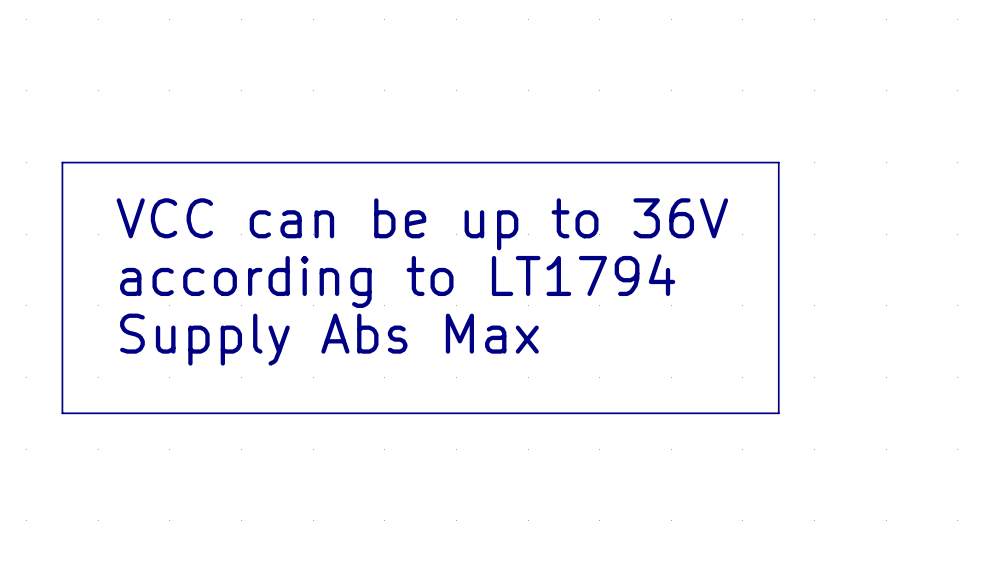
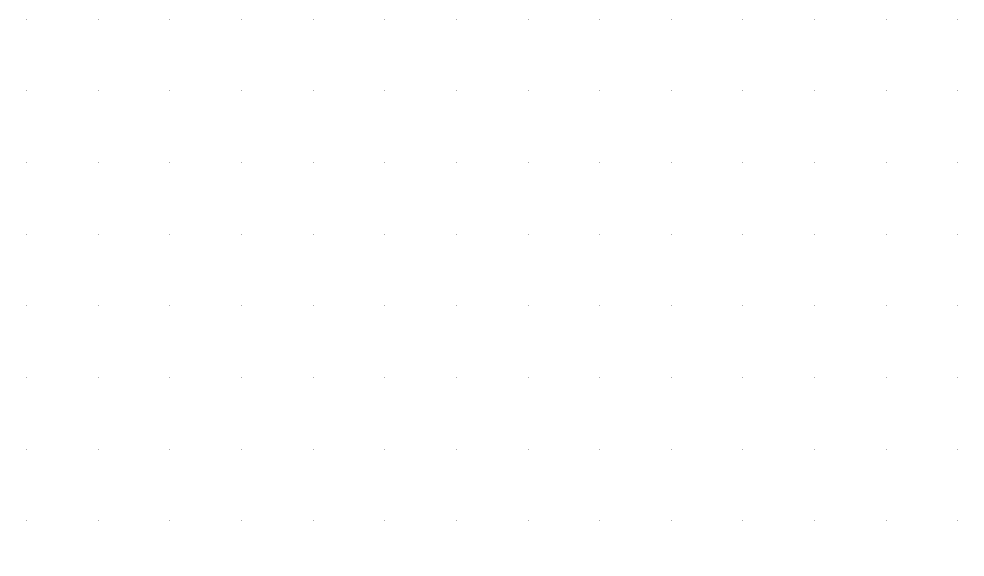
line: (62, 162) (778, 162) (778, 413) (62, 413) (62, 162) -> none
text: VCC can be up to 36V (422, 224) -> none
text: according to LT1794 (397, 281) -> none
text: Supply Abs Max (329, 339) -> none

